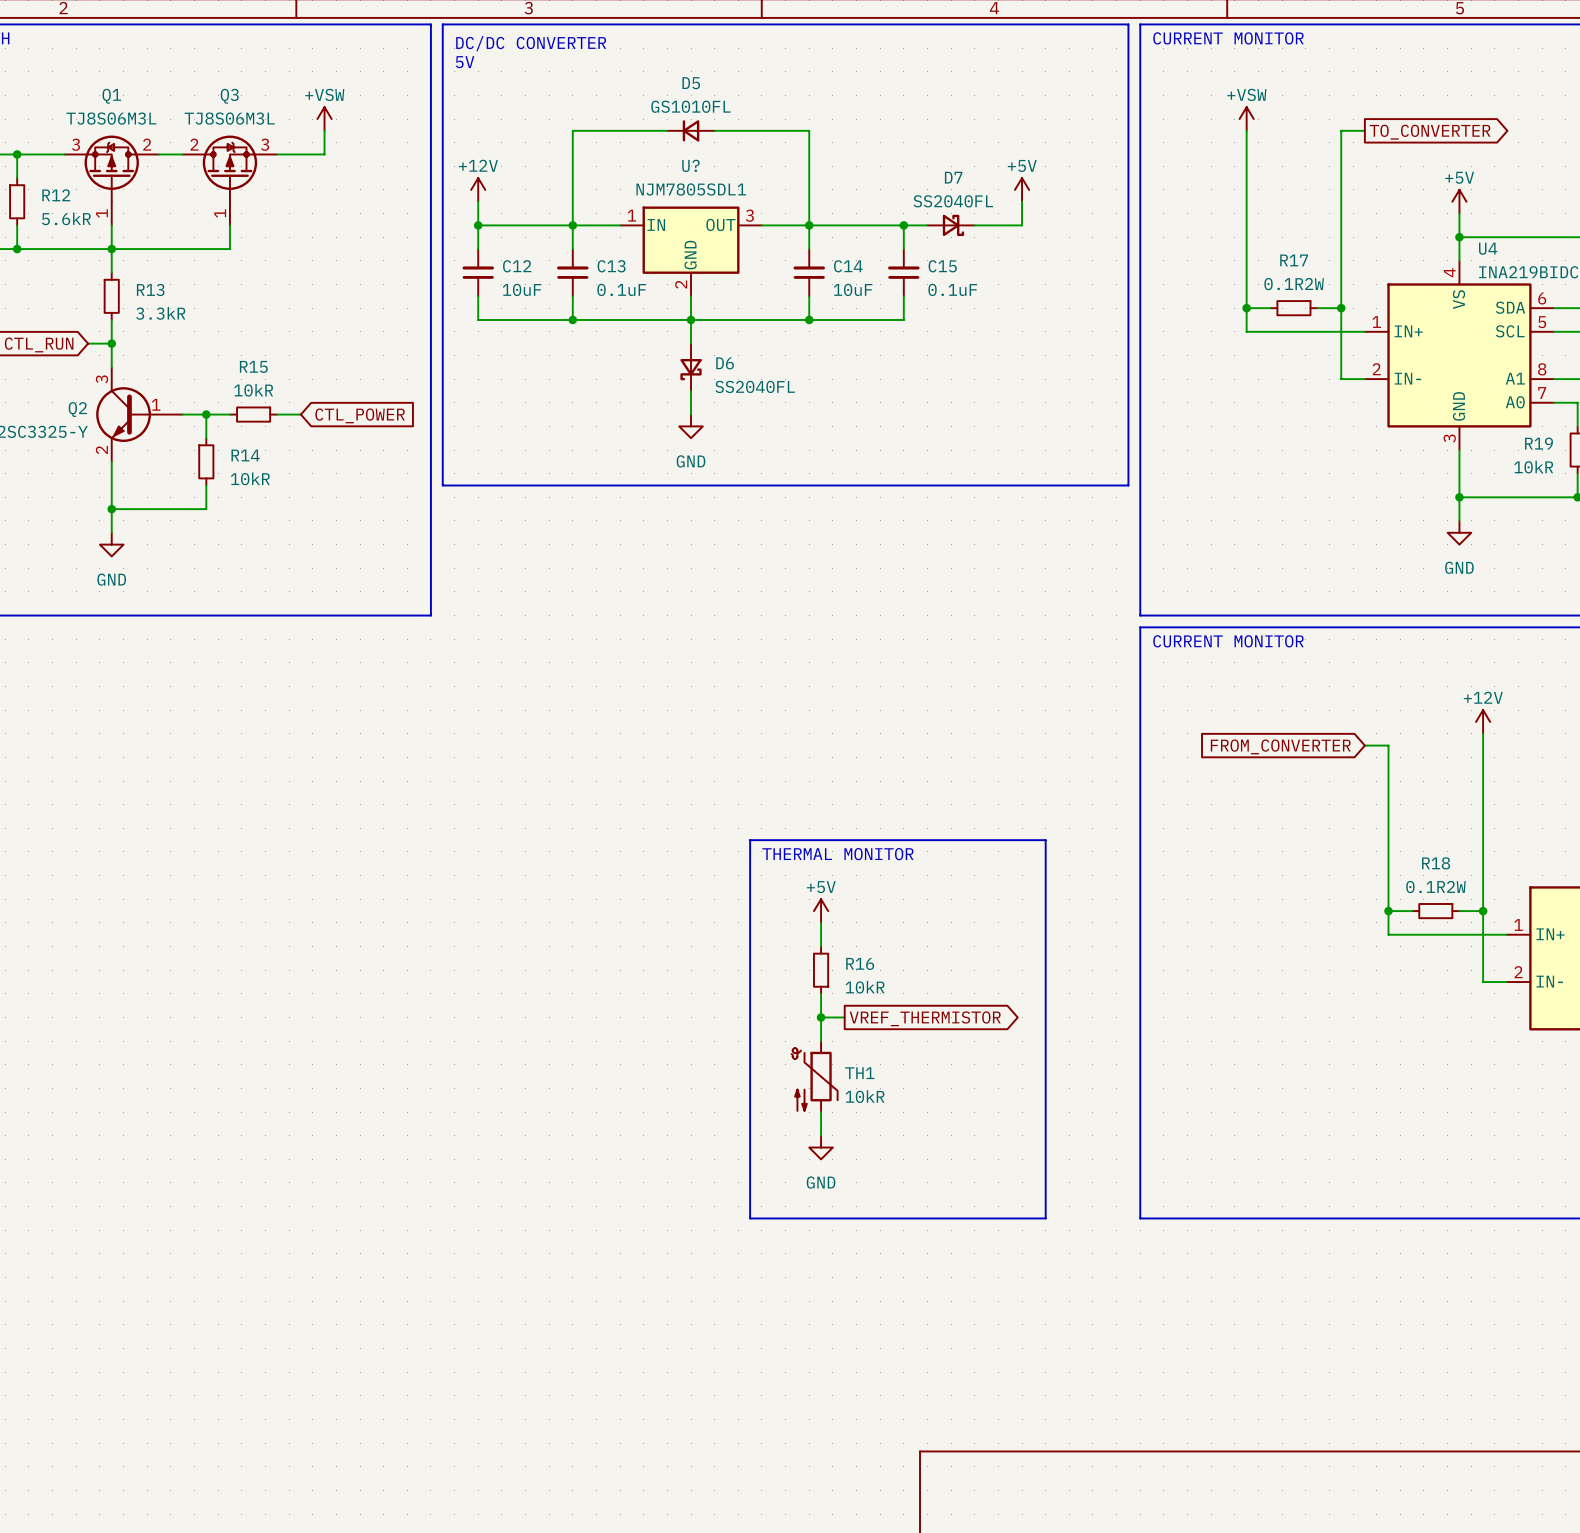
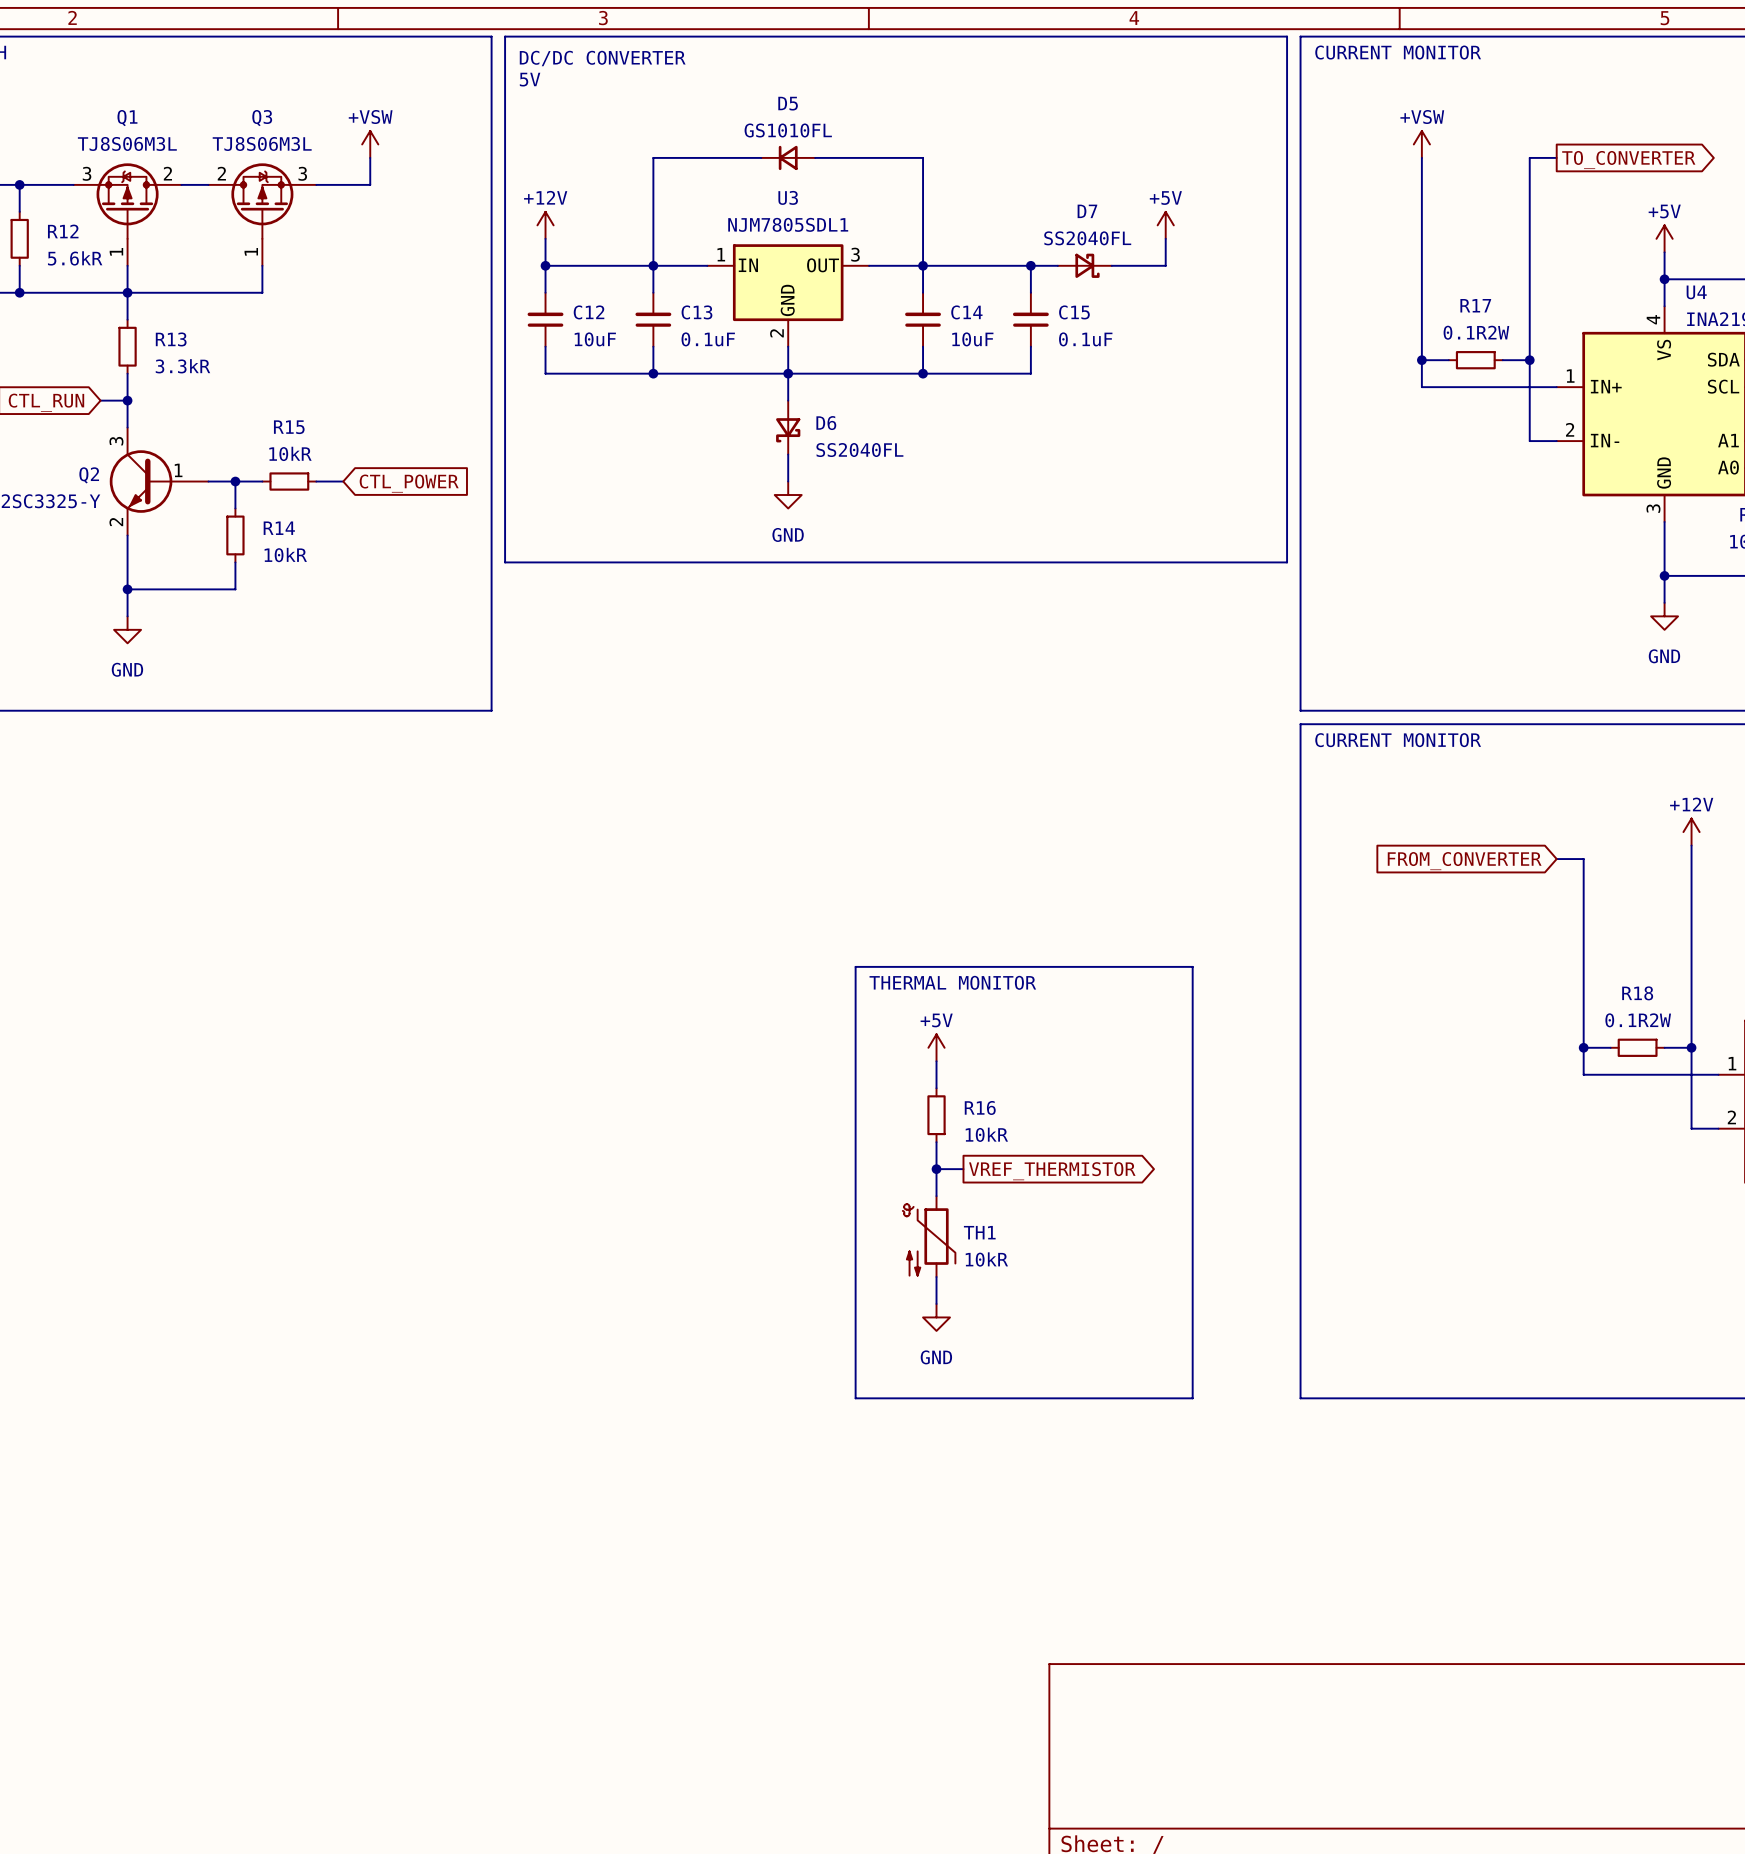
U? name: U? (690, 165) -> U3 (788, 197)

